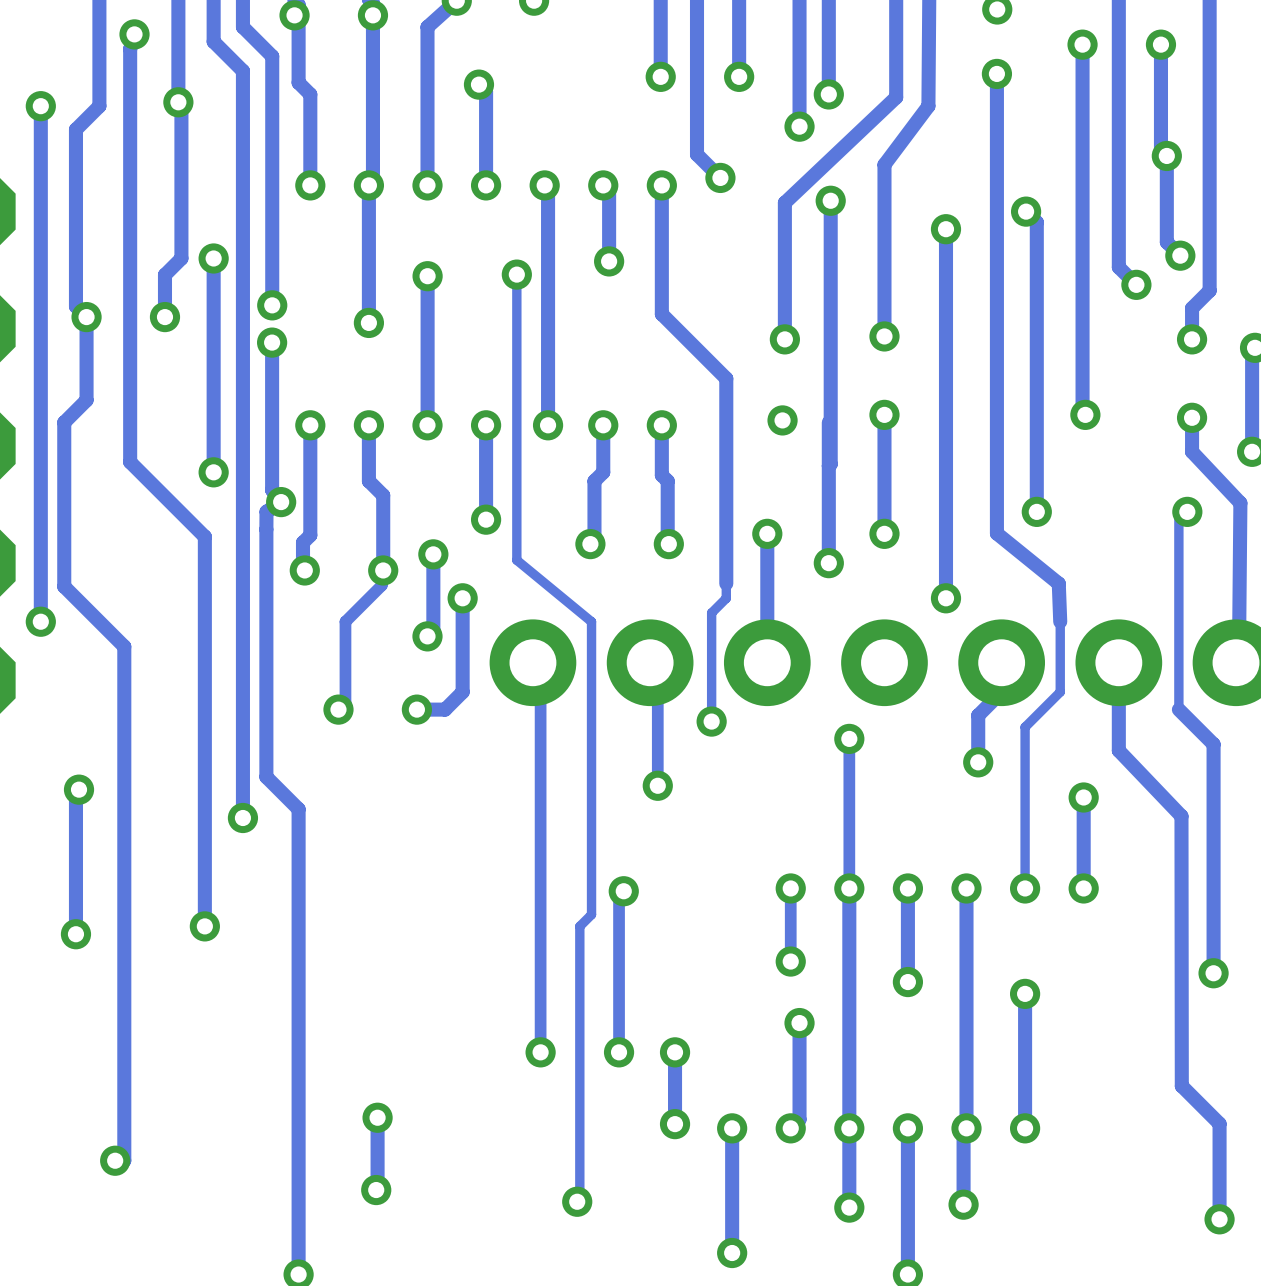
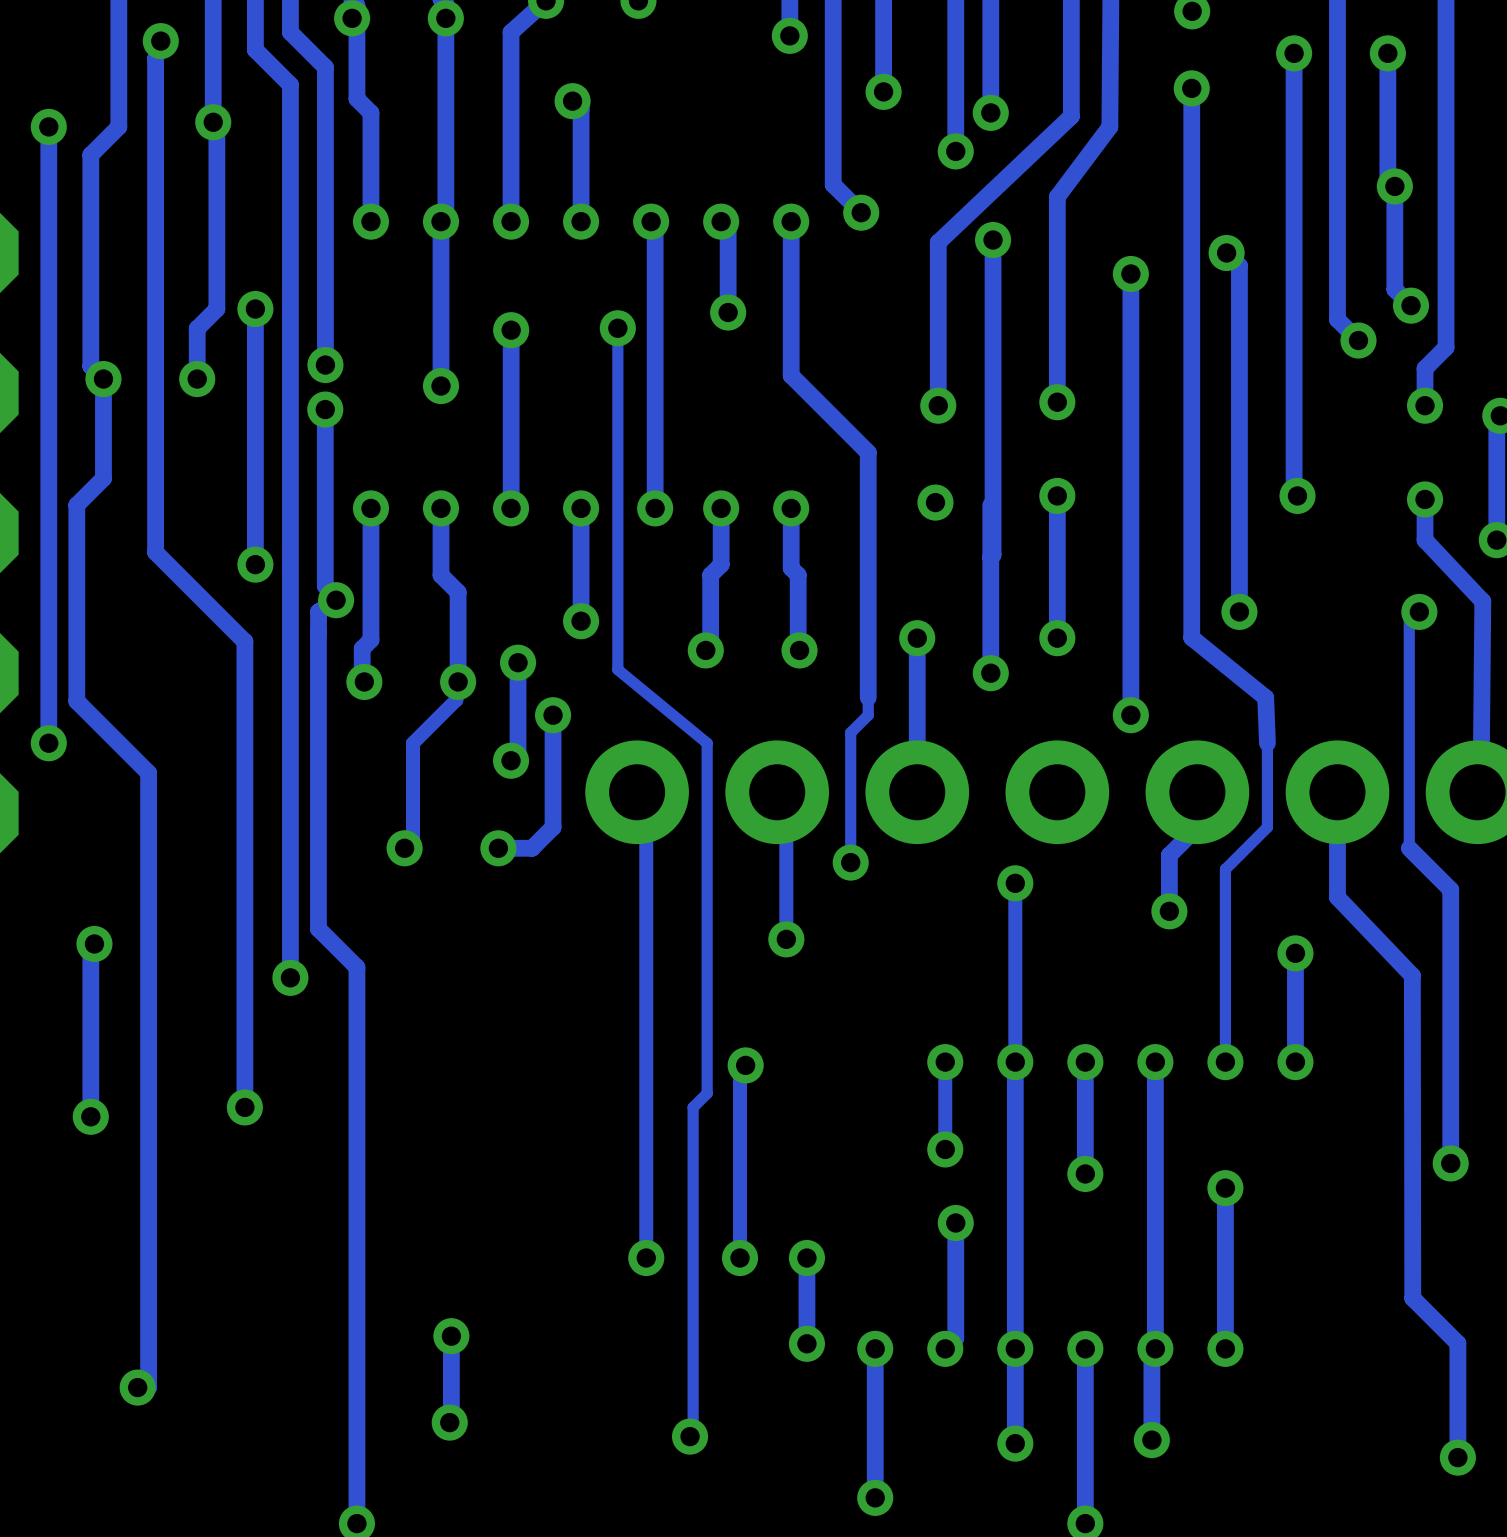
track: (660, 30) (660, 76) -> none
via position: (660, 76) -> (789, 35)

